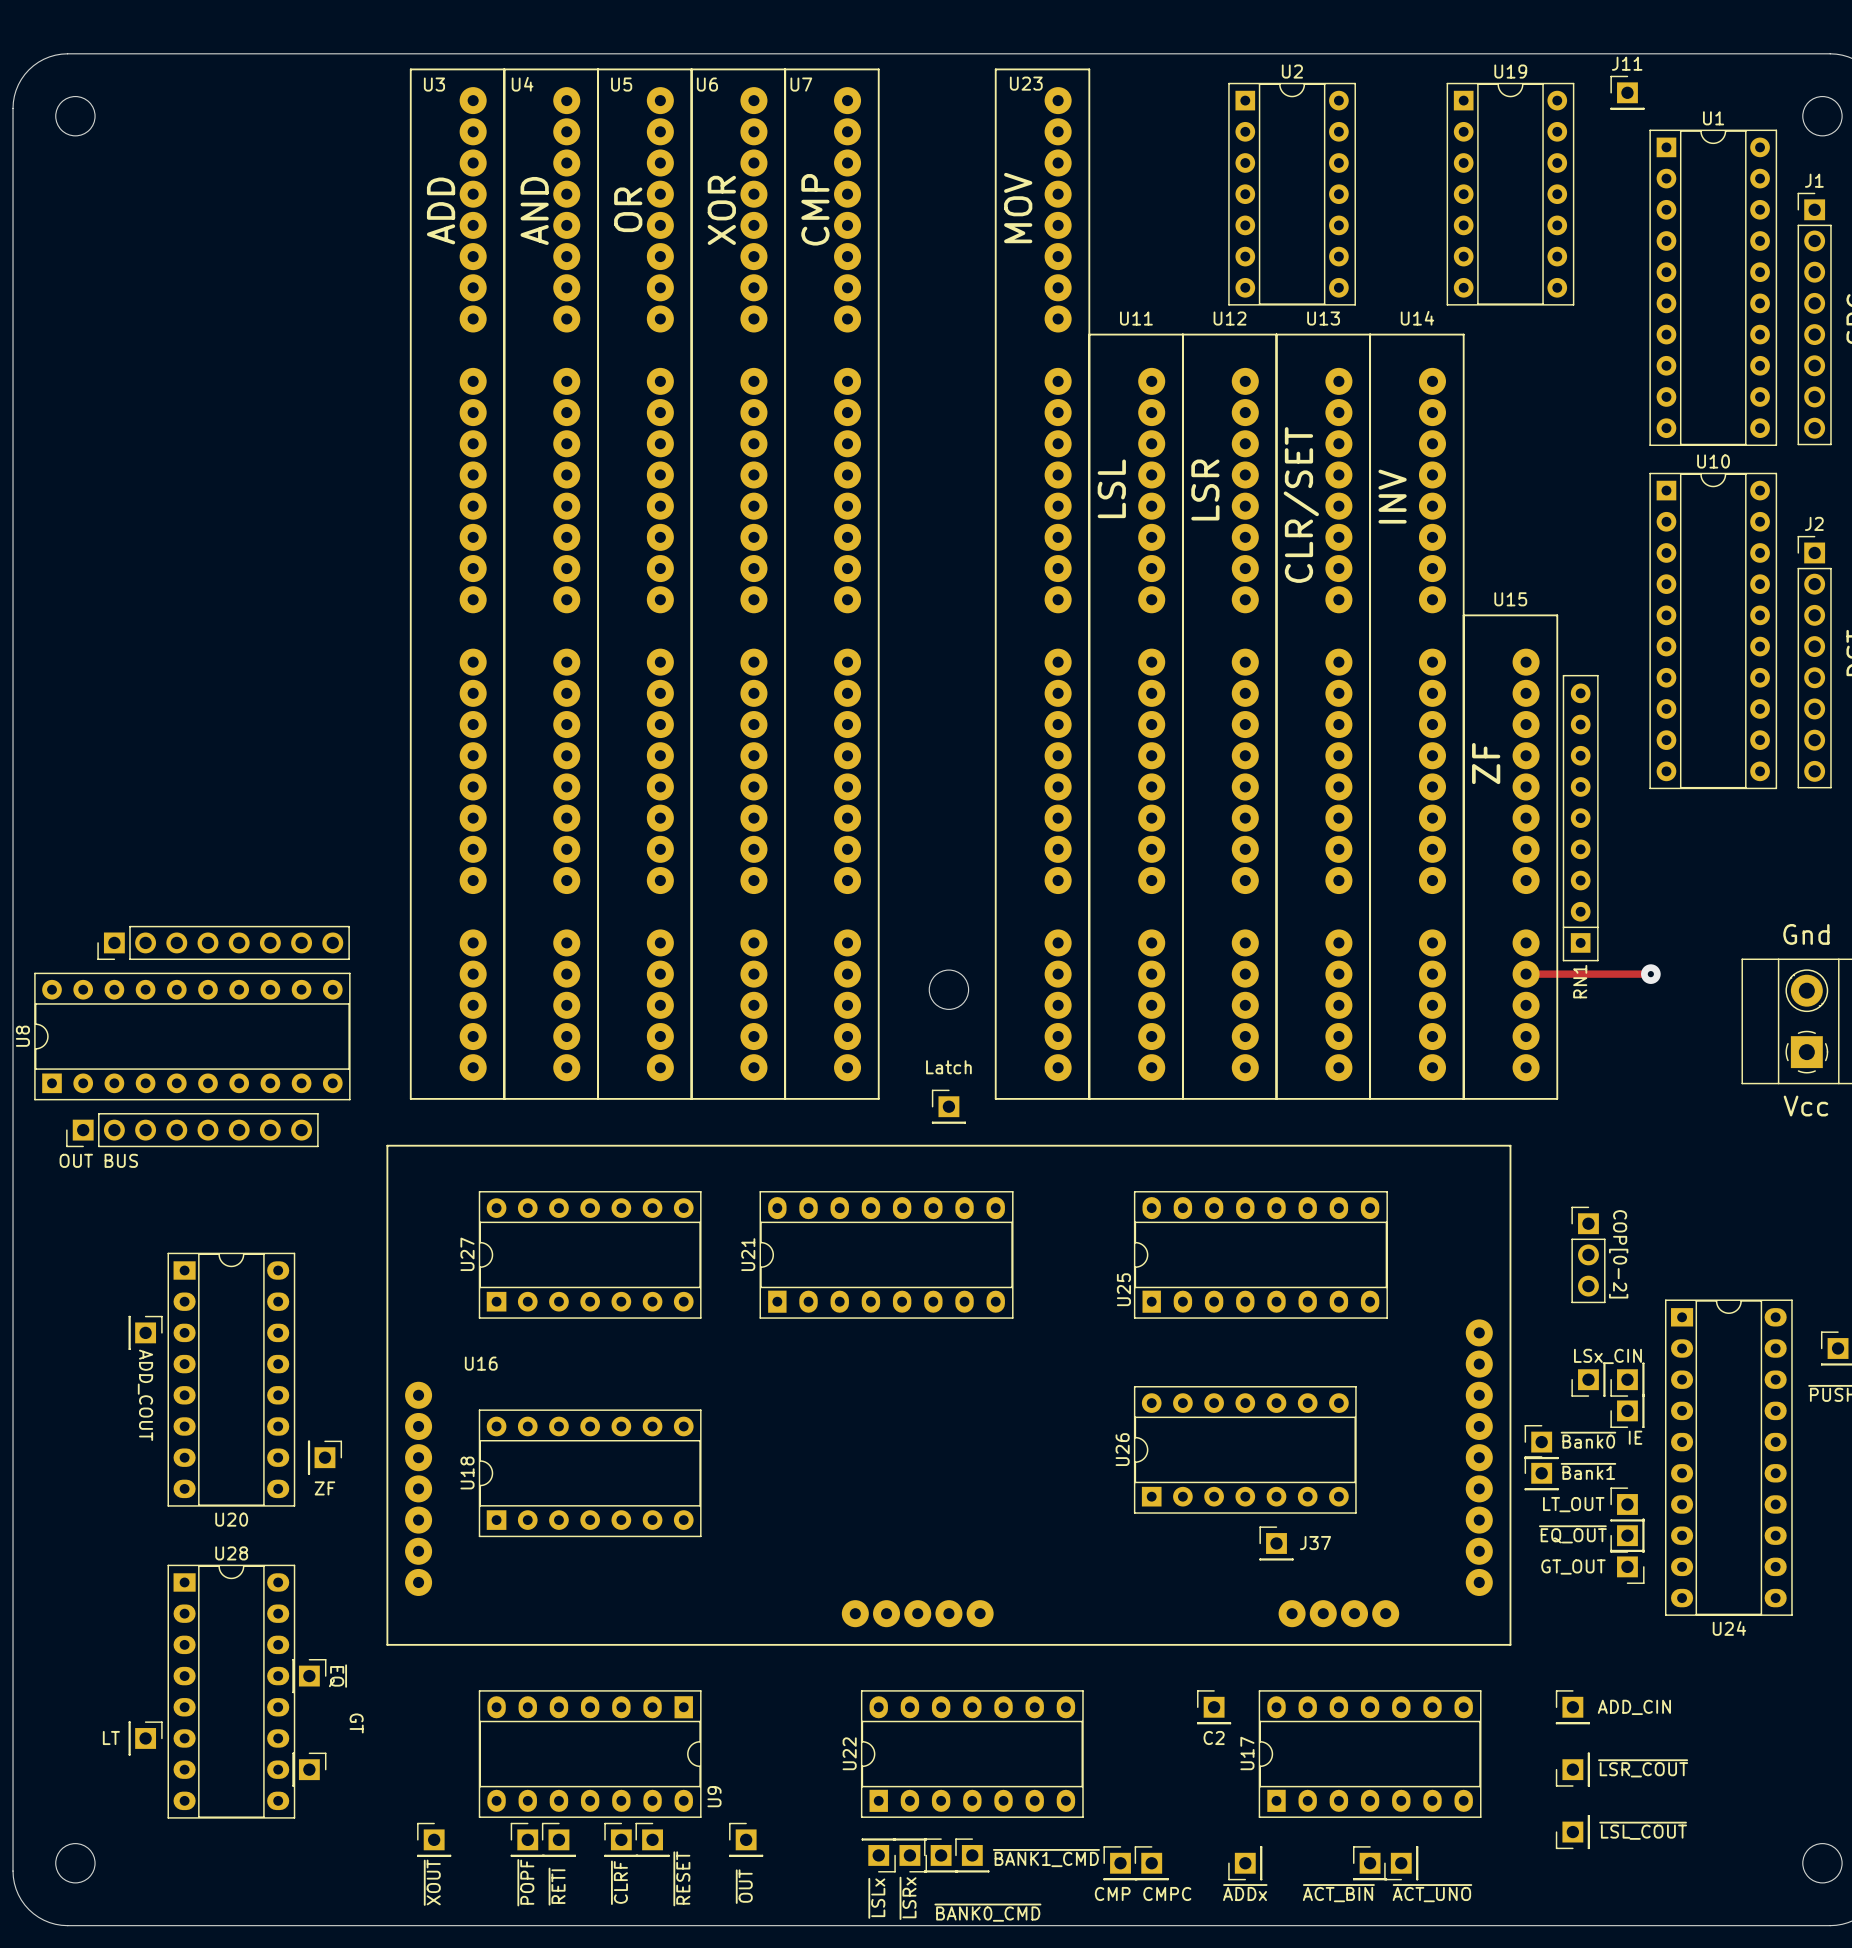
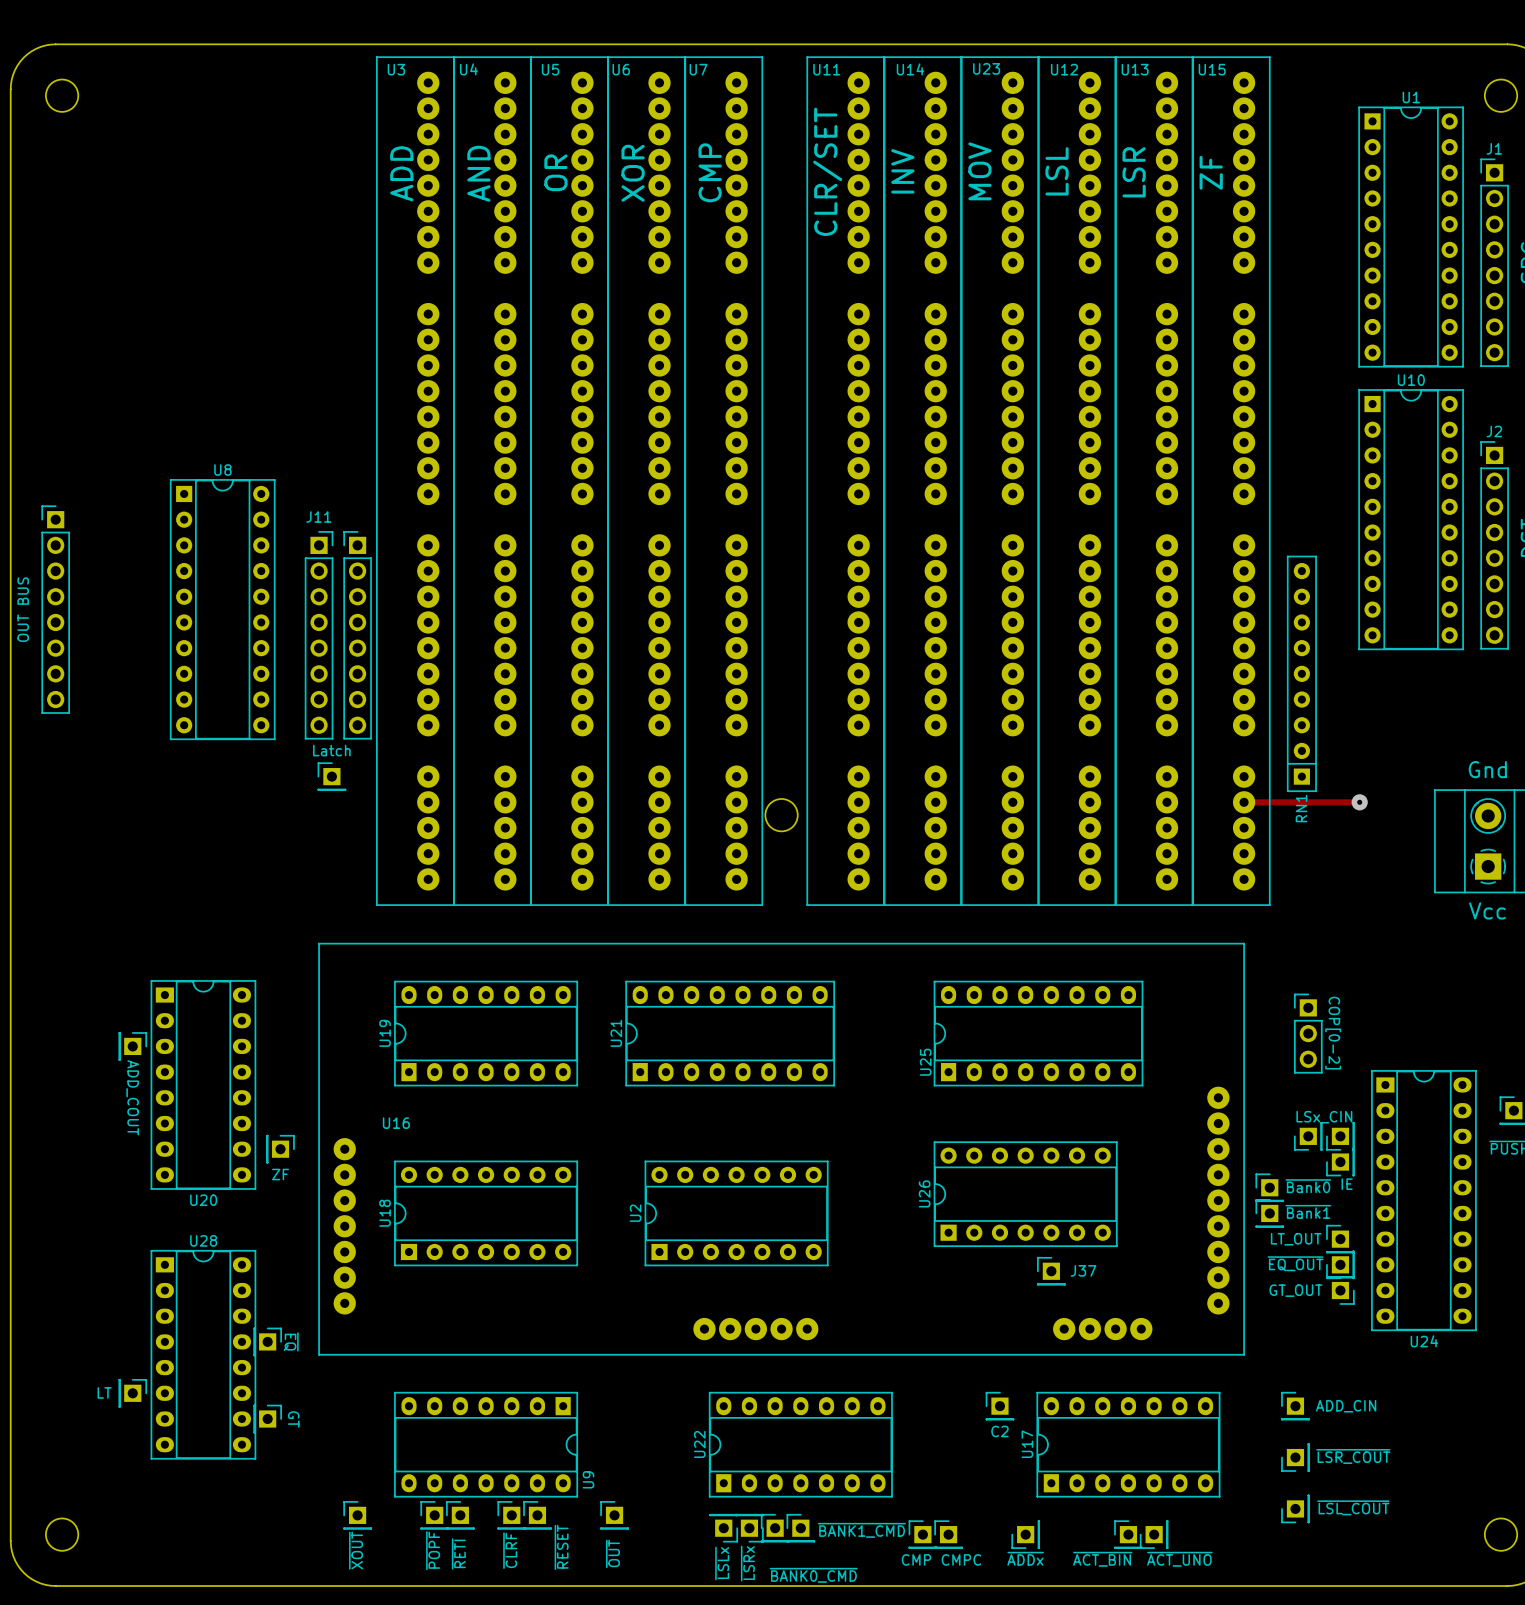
J11 name position: J11 (1627, 63) -> J11 (318, 516)
U19 name position: U19 (1510, 71) -> U19 (385, 1033)
J11 footprint: [1610, 75, 1645, 110] -> [304, 531, 334, 740]
U19 footprint: [1446, 82, 1575, 306] -> [394, 980, 578, 1087]
U2 rotation: 0° (1292, 194) -> 90° counterclockwise (736, 1213)
U2 position: (1292, 194) -> (736, 1213)
text: none -> CLR/SET (827, 171)
text position: MOV (1018, 208) -> MOV (979, 171)
text: none -> INV (902, 171)
text: none -> LSL (1057, 171)
text position: OR (628, 209) -> OR (555, 172)
text position: CMP (815, 209) -> CMP (710, 172)
text: none -> LSR (1134, 172)
text: none -> ZF (1211, 172)
text position: ADD (441, 210) -> ADD (401, 173)
text position: AND (534, 210) -> AND (478, 173)
text position: XOR (721, 210) -> XOR (633, 173)
U11 name position: U11 (1136, 318) -> U11 (826, 69)
U12 name position: U12 (1229, 318) -> U12 (1064, 69)
U13 name position: U13 (1323, 318) -> U13 (1135, 69)
U14 name position: U14 (1417, 318) -> U14 (910, 69)
U11 footprint: [1088, 333, 1184, 1100] -> [806, 56, 886, 906]
U12 footprint: [1181, 333, 1278, 1100] -> [1037, 56, 1117, 906]
U13 footprint: [1275, 333, 1372, 1100] -> [1114, 56, 1194, 906]
U14 footprint: [1369, 333, 1465, 1100] -> [883, 56, 963, 906]
text: LSL (1111, 488) -> none
text: LSR (1205, 489) -> none
text: INV (1392, 496) -> none
text: CLR/SET (1301, 505) -> none
U3 position: (457, 584) -> (415, 481)
U4 position: (551, 584) -> (492, 481)
U5 position: (644, 584) -> (569, 481)
U6 position: (738, 584) -> (646, 481)
U7 position: (831, 584) -> (723, 481)
U23 position: (1042, 584) -> (999, 481)
U15 name position: U15 (1510, 599) -> U15 (1212, 69)
U15 footprint: [1462, 614, 1559, 1100] -> [1191, 56, 1271, 906]
text: none -> OUT BUS (23, 609)
part: none -> (55, 609)
text: ZF (1486, 763) -> none
part: none -> (357, 635)
text: none -> Latch (331, 750)
part: (223, 942) -> none
part: none -> (331, 776)
U8 rotation: 0° (192, 1036) -> 90° clockwise (222, 609)
U8 position: (192, 1036) -> (222, 609)
text: Latch (948, 1067) -> none
part: (948, 1106) -> none
part: (192, 1130) -> none
text: OUT BUS (98, 1160) -> none
U27: (590, 1254) -> none
part position: (145, 1332) -> (132, 1046)
U20 position: (231, 1379) -> (203, 1084)
text position: ADD_COUT (145, 1395) -> ADD_COUT (132, 1097)
part position: (324, 1457) -> (280, 1149)
text position: ZF (324, 1488) -> ZF (280, 1174)
part: none -> (267, 1341)
part: (309, 1676) -> none
text position: ~{EQ} (337, 1676) -> ~{EQ} (291, 1341)
U28 position: (231, 1691) -> (203, 1354)
part: none -> (267, 1419)
text position: LT (111, 1738) -> LT (104, 1392)
part position: (145, 1738) -> (132, 1393)
part: (309, 1769) -> none

